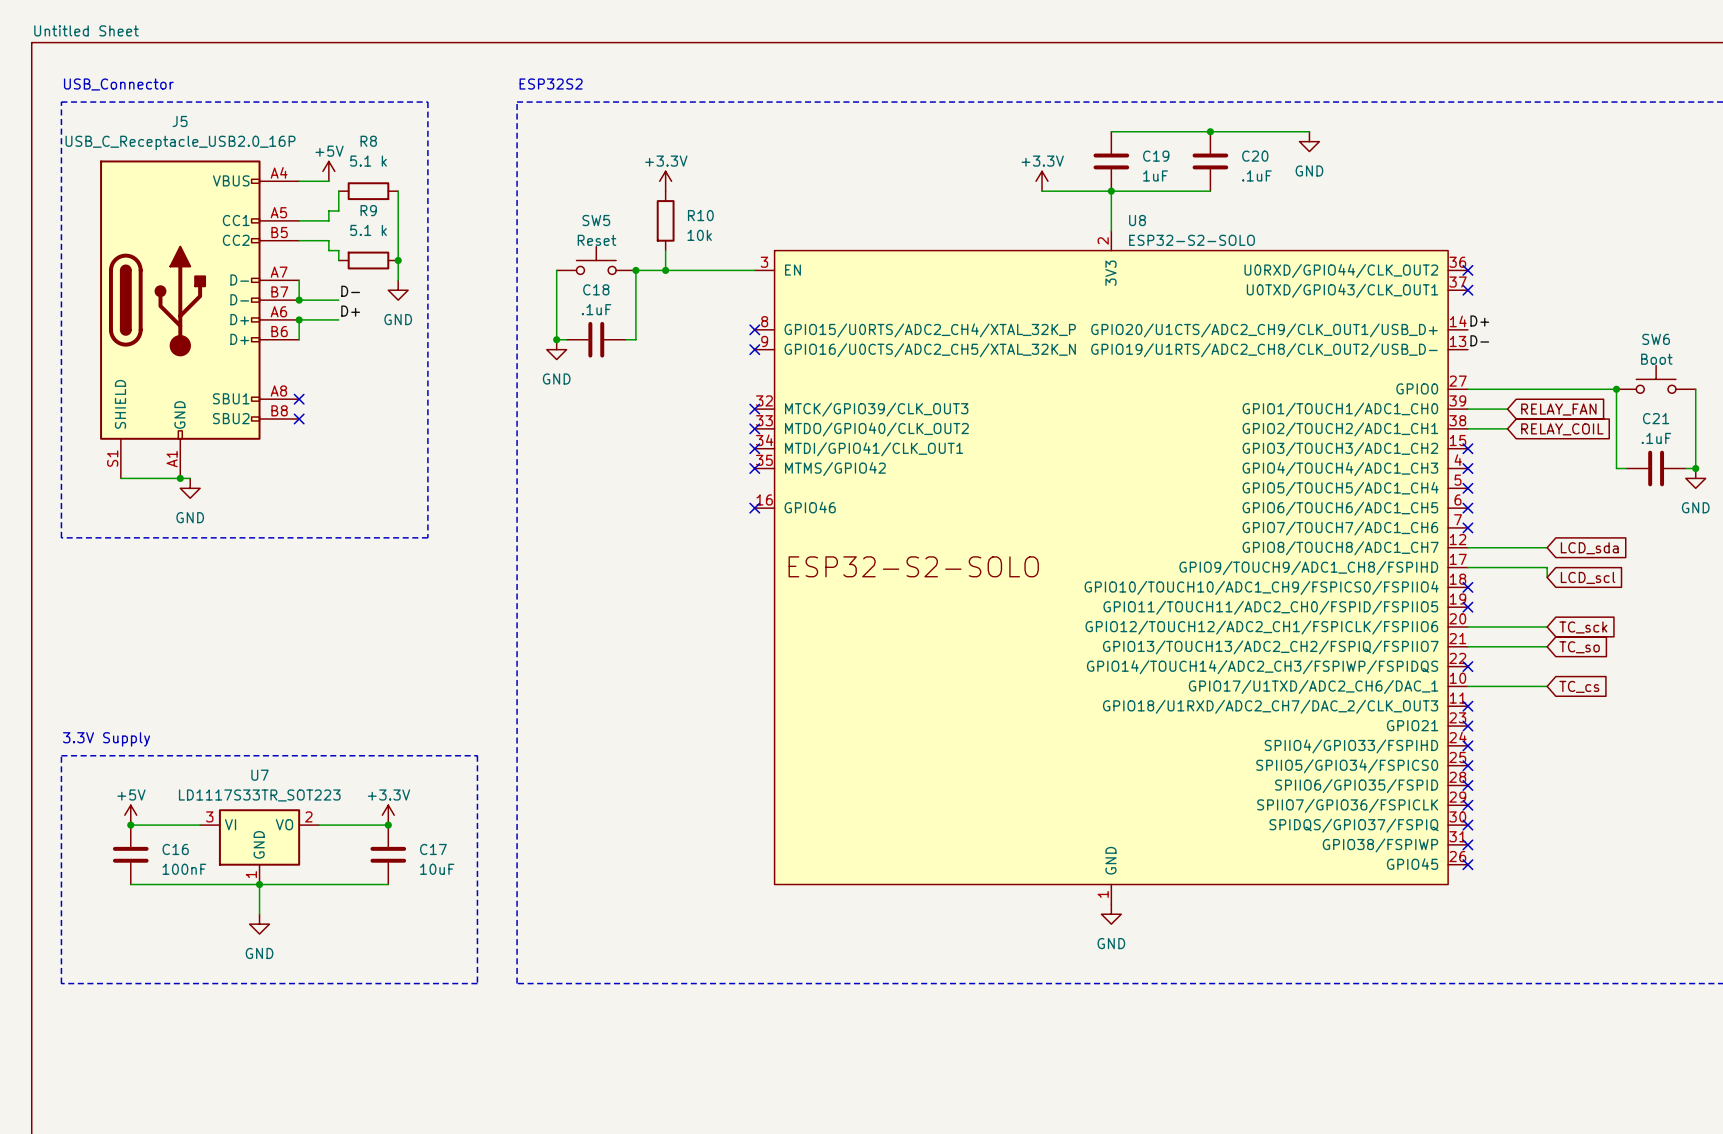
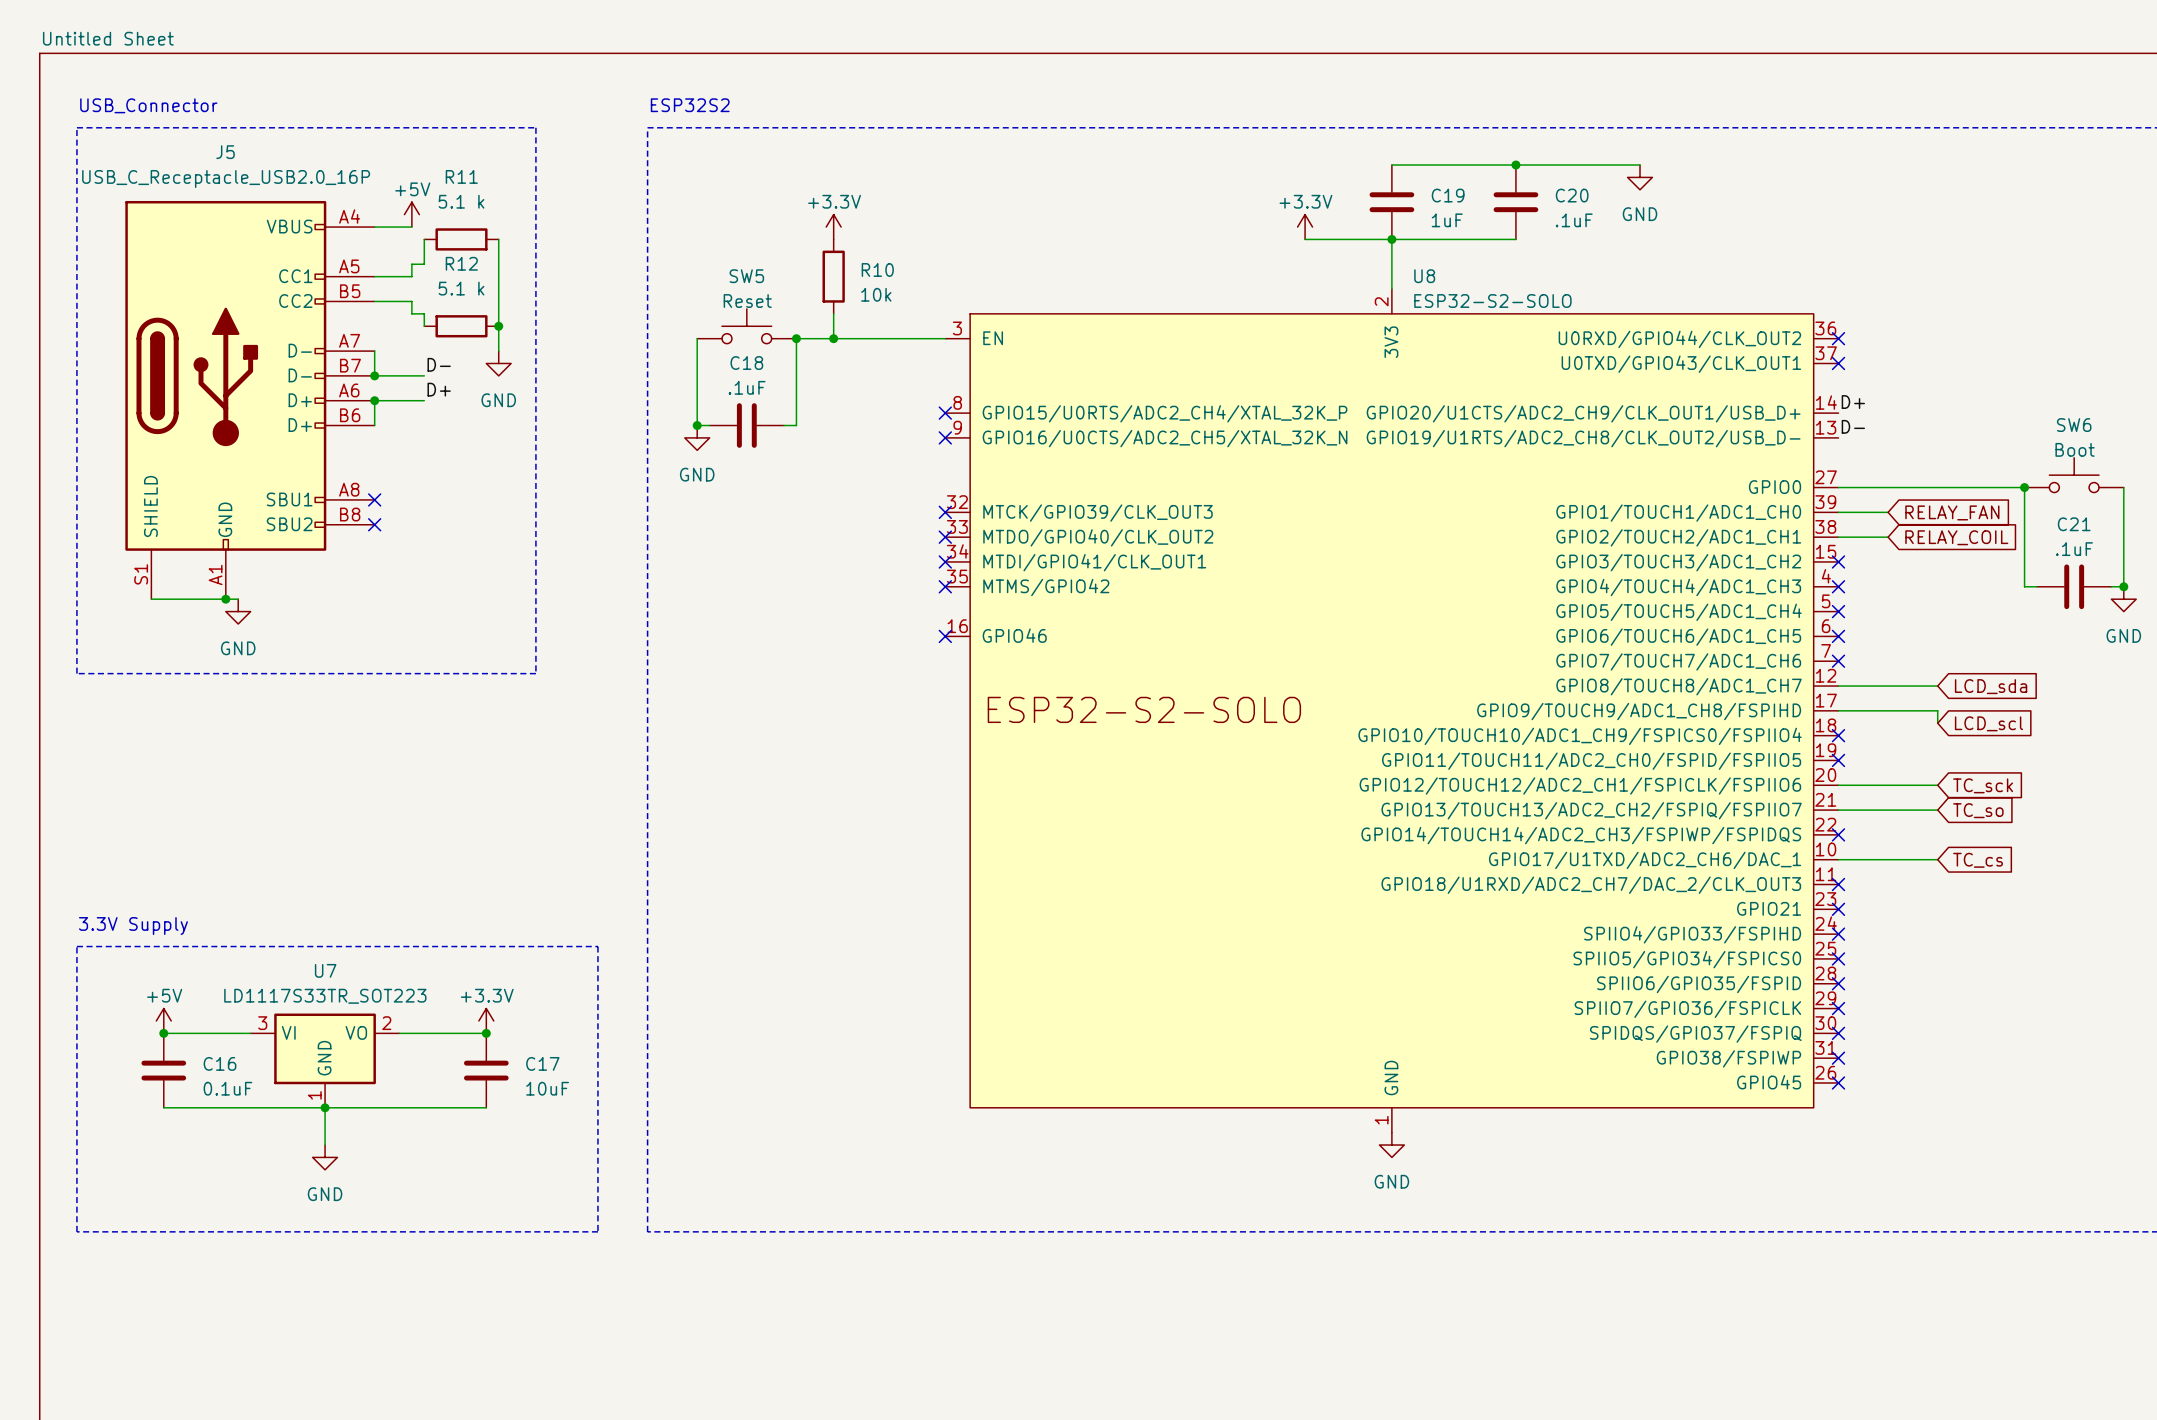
R8 name: R8 (368, 141) -> R11 (461, 176)
R9 name: R9 (368, 210) -> R12 (461, 263)
C16 value: 100nF (184, 869) -> 0.1uF (227, 1088)

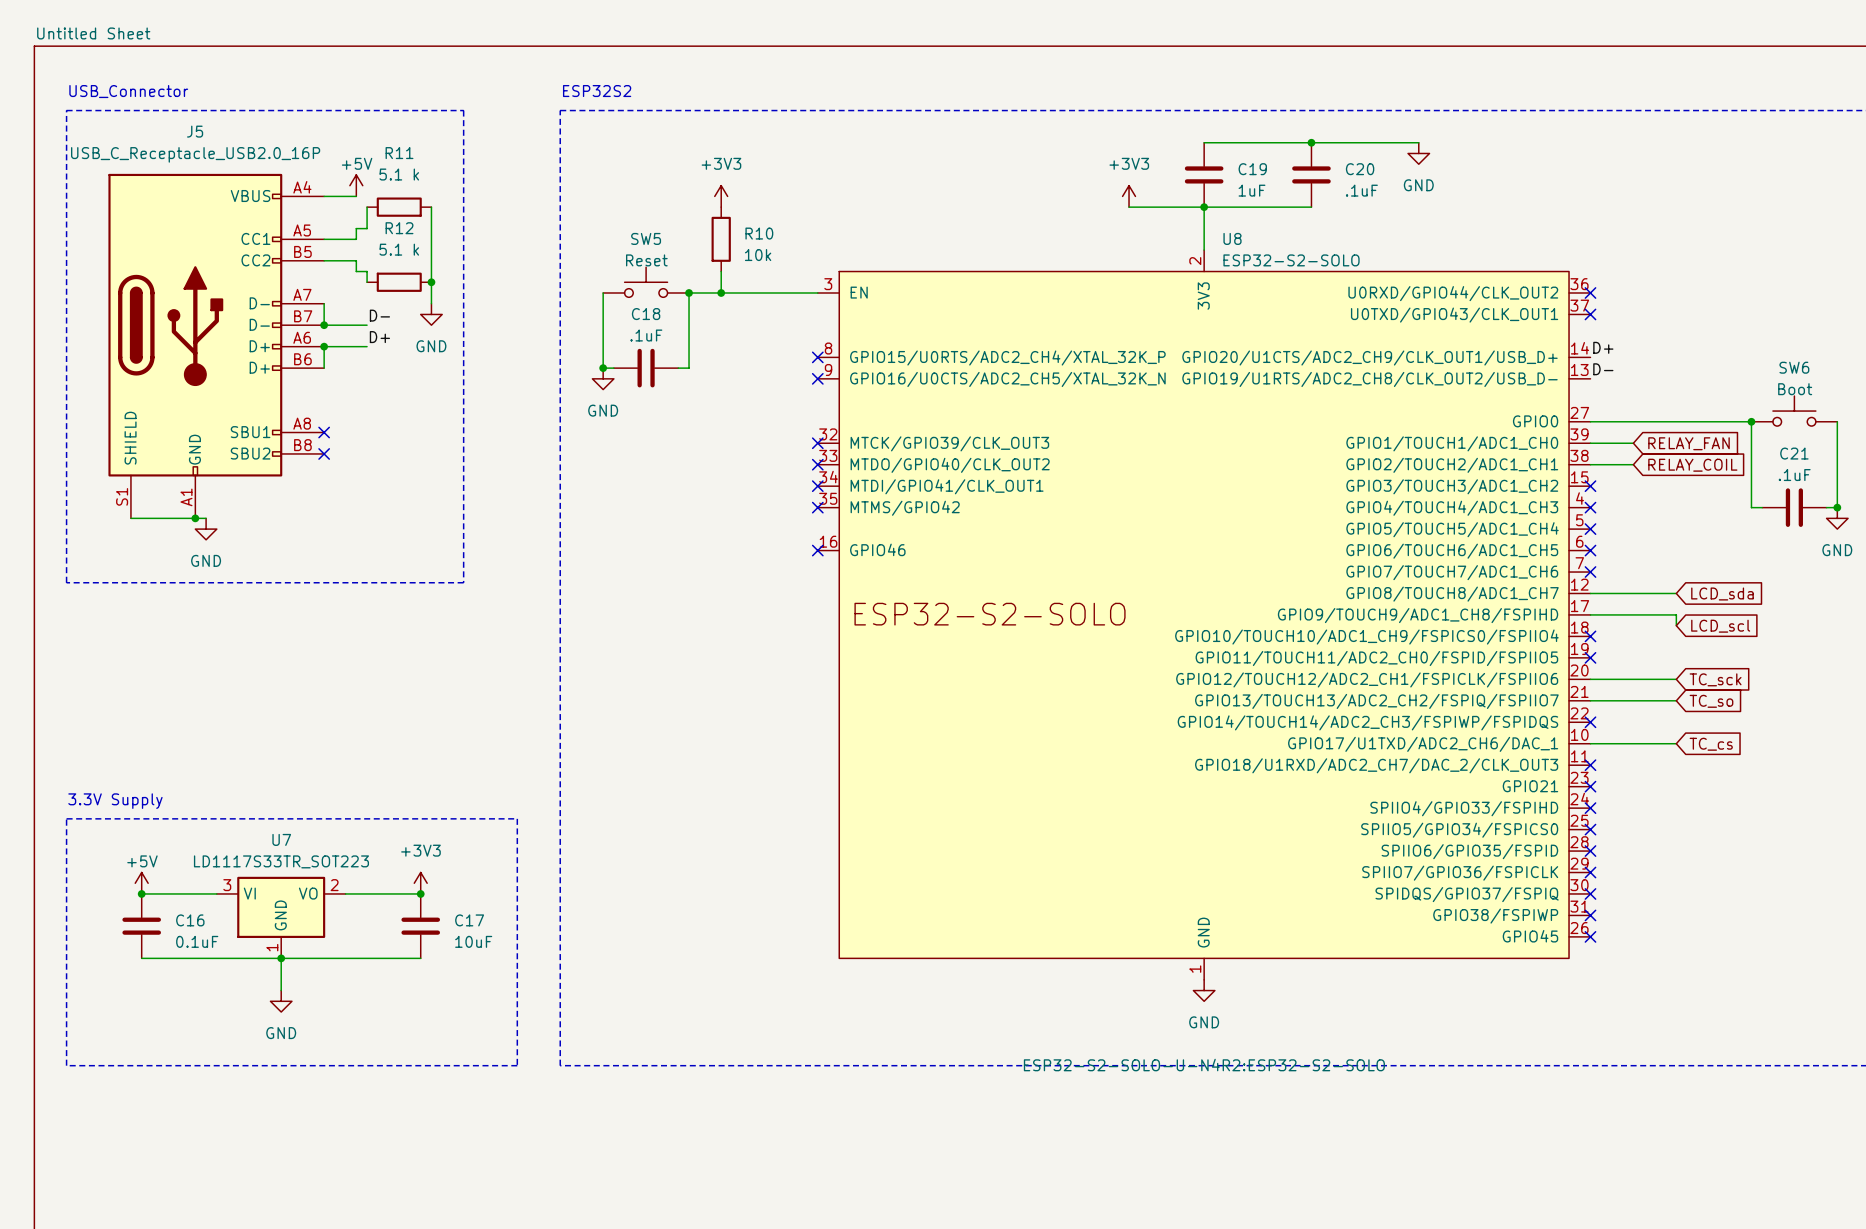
power symbol: +3.3V (833, 227) -> +3V3 (721, 196)
power symbol: +3.3V (1305, 227) -> +3V3 (1129, 196)
power symbol: +3.3V (486, 1020) -> +3V3 (420, 883)
U8 text: none -> ESP32-S2-SOLO-U-N4R2:ESP32-S2-SOLO (1204, 1065)

